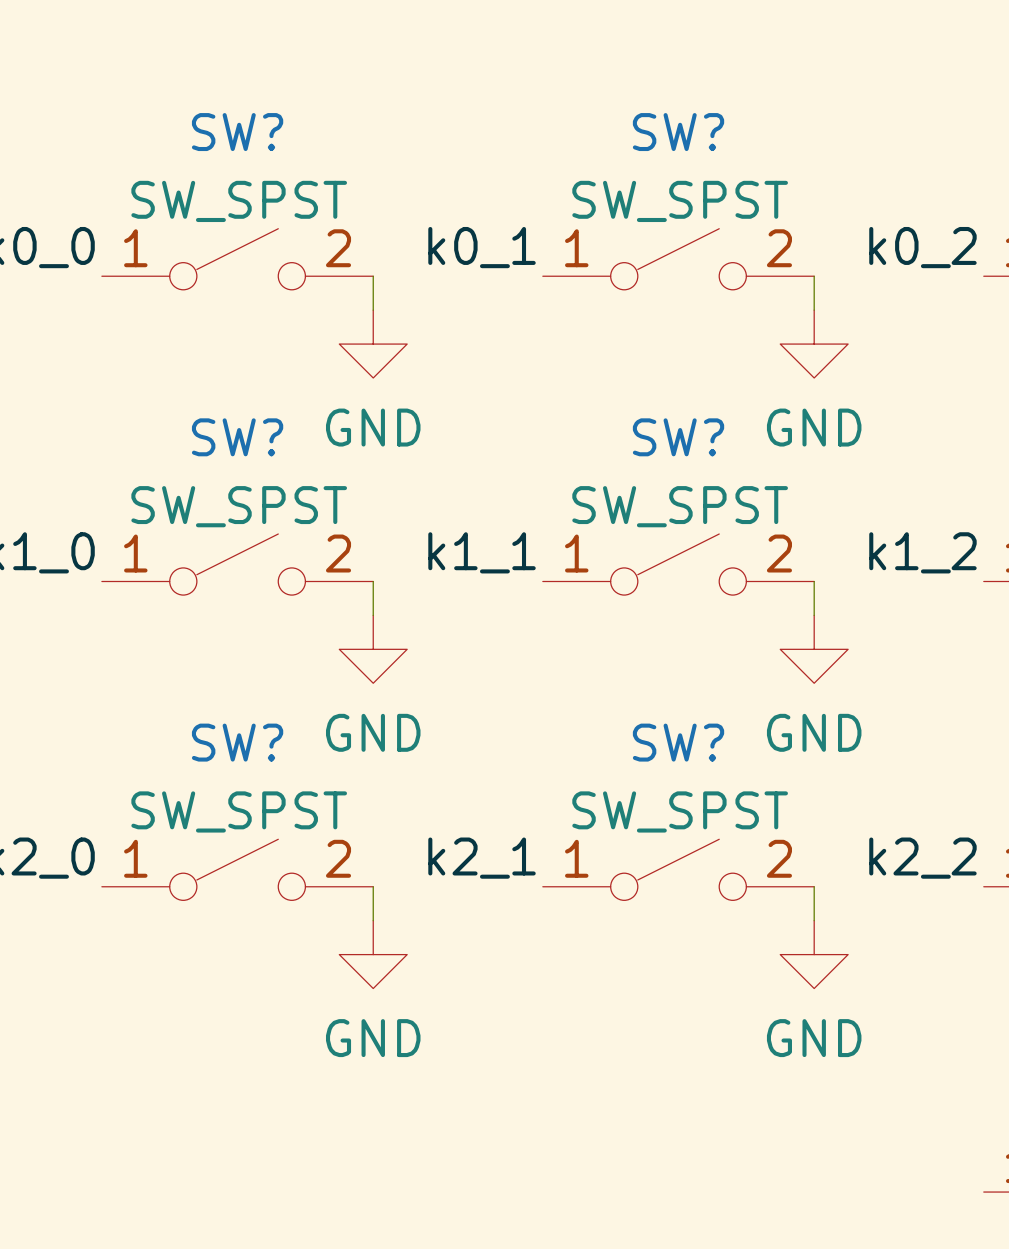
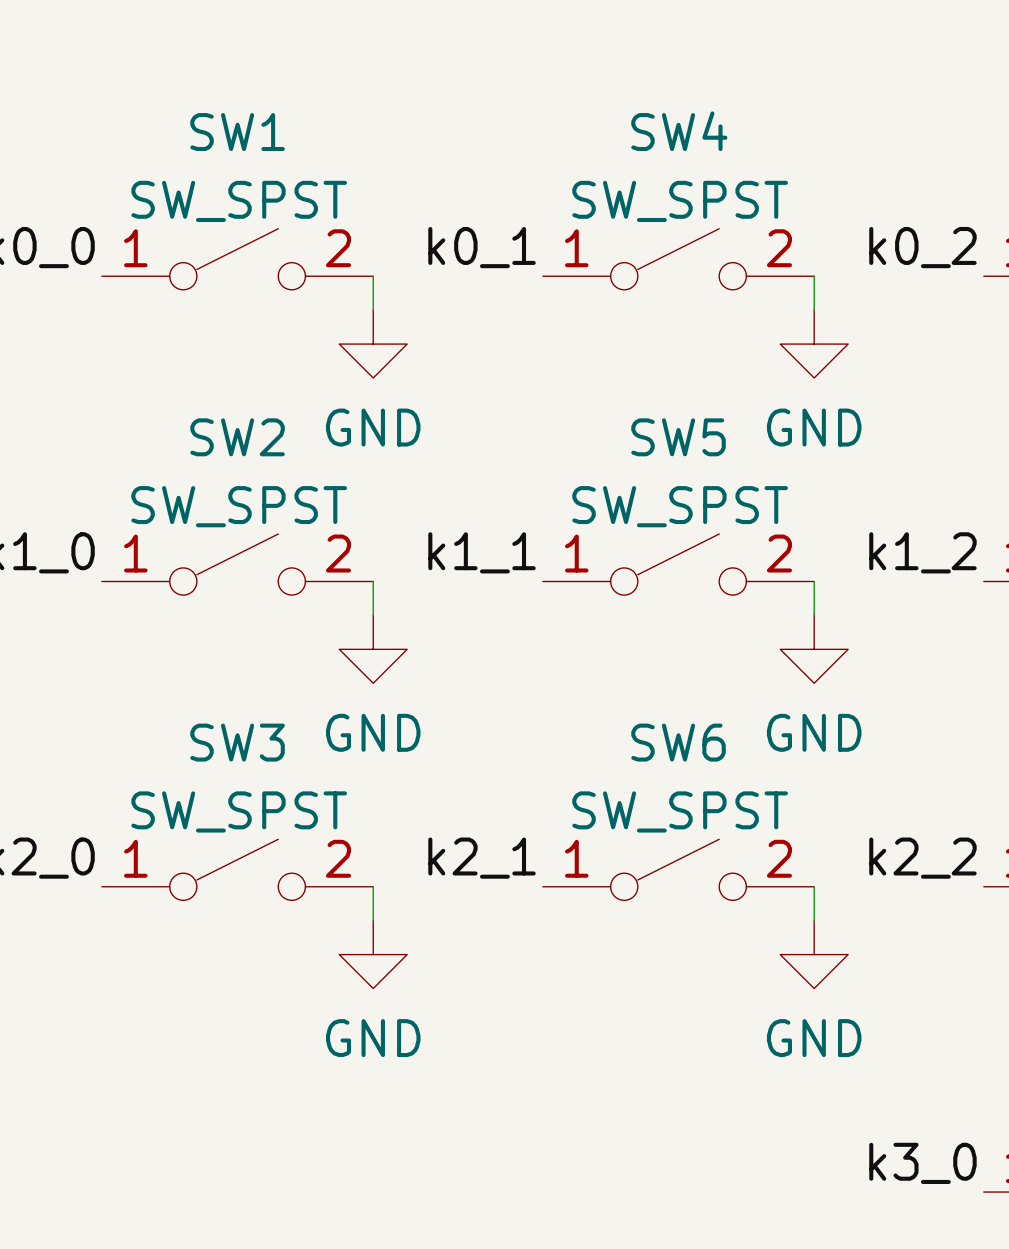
SW? name: SW? (237, 132) -> SW1 (237, 132)
SW? name: SW? (678, 132) -> SW4 (679, 131)
SW? name: SW? (237, 437) -> SW2 (237, 437)
SW? name: SW? (678, 437) -> SW5 (678, 437)
SW? name: SW? (237, 742) -> SW3 (237, 742)
SW? name: SW? (678, 742) -> SW6 (678, 742)
label: none -> k3_0 (922, 1163)

